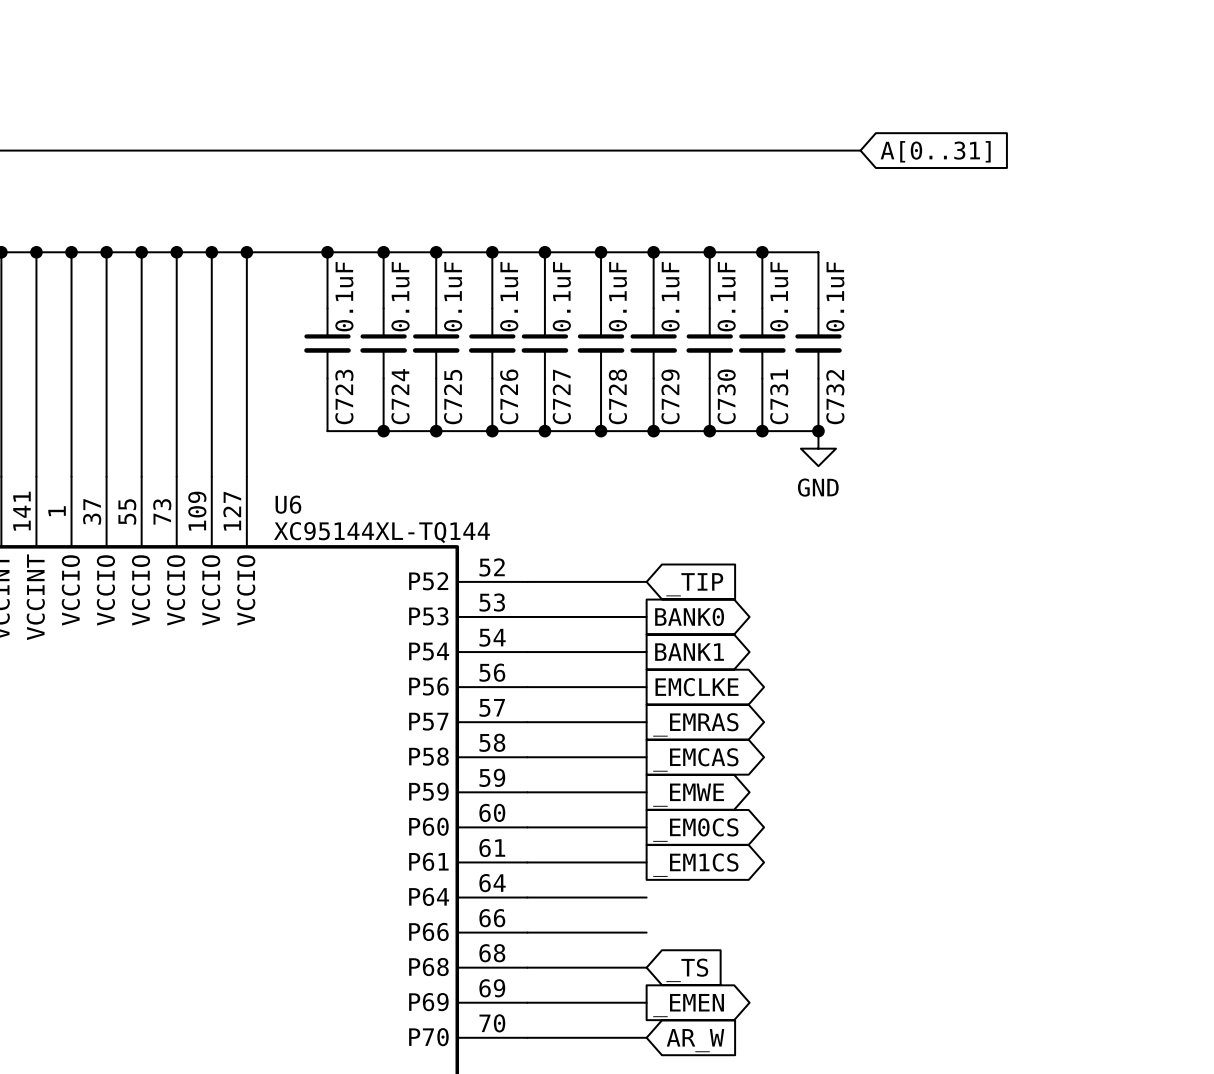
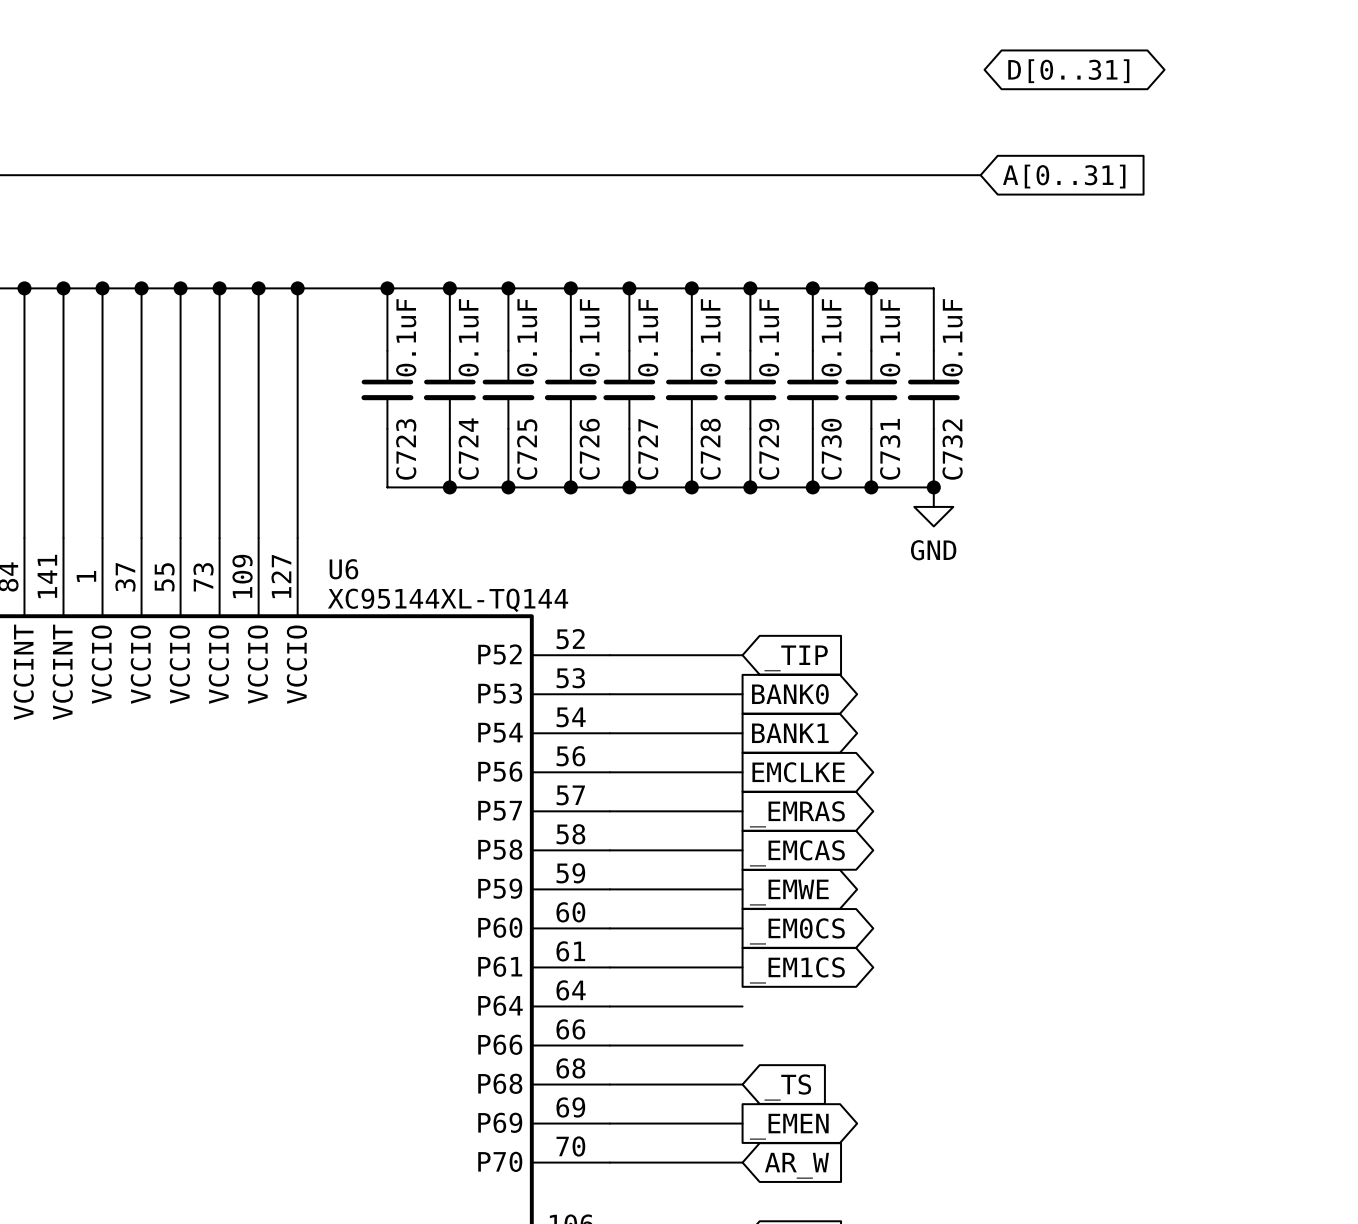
global label: none -> D[0..31] (1068, 71)

